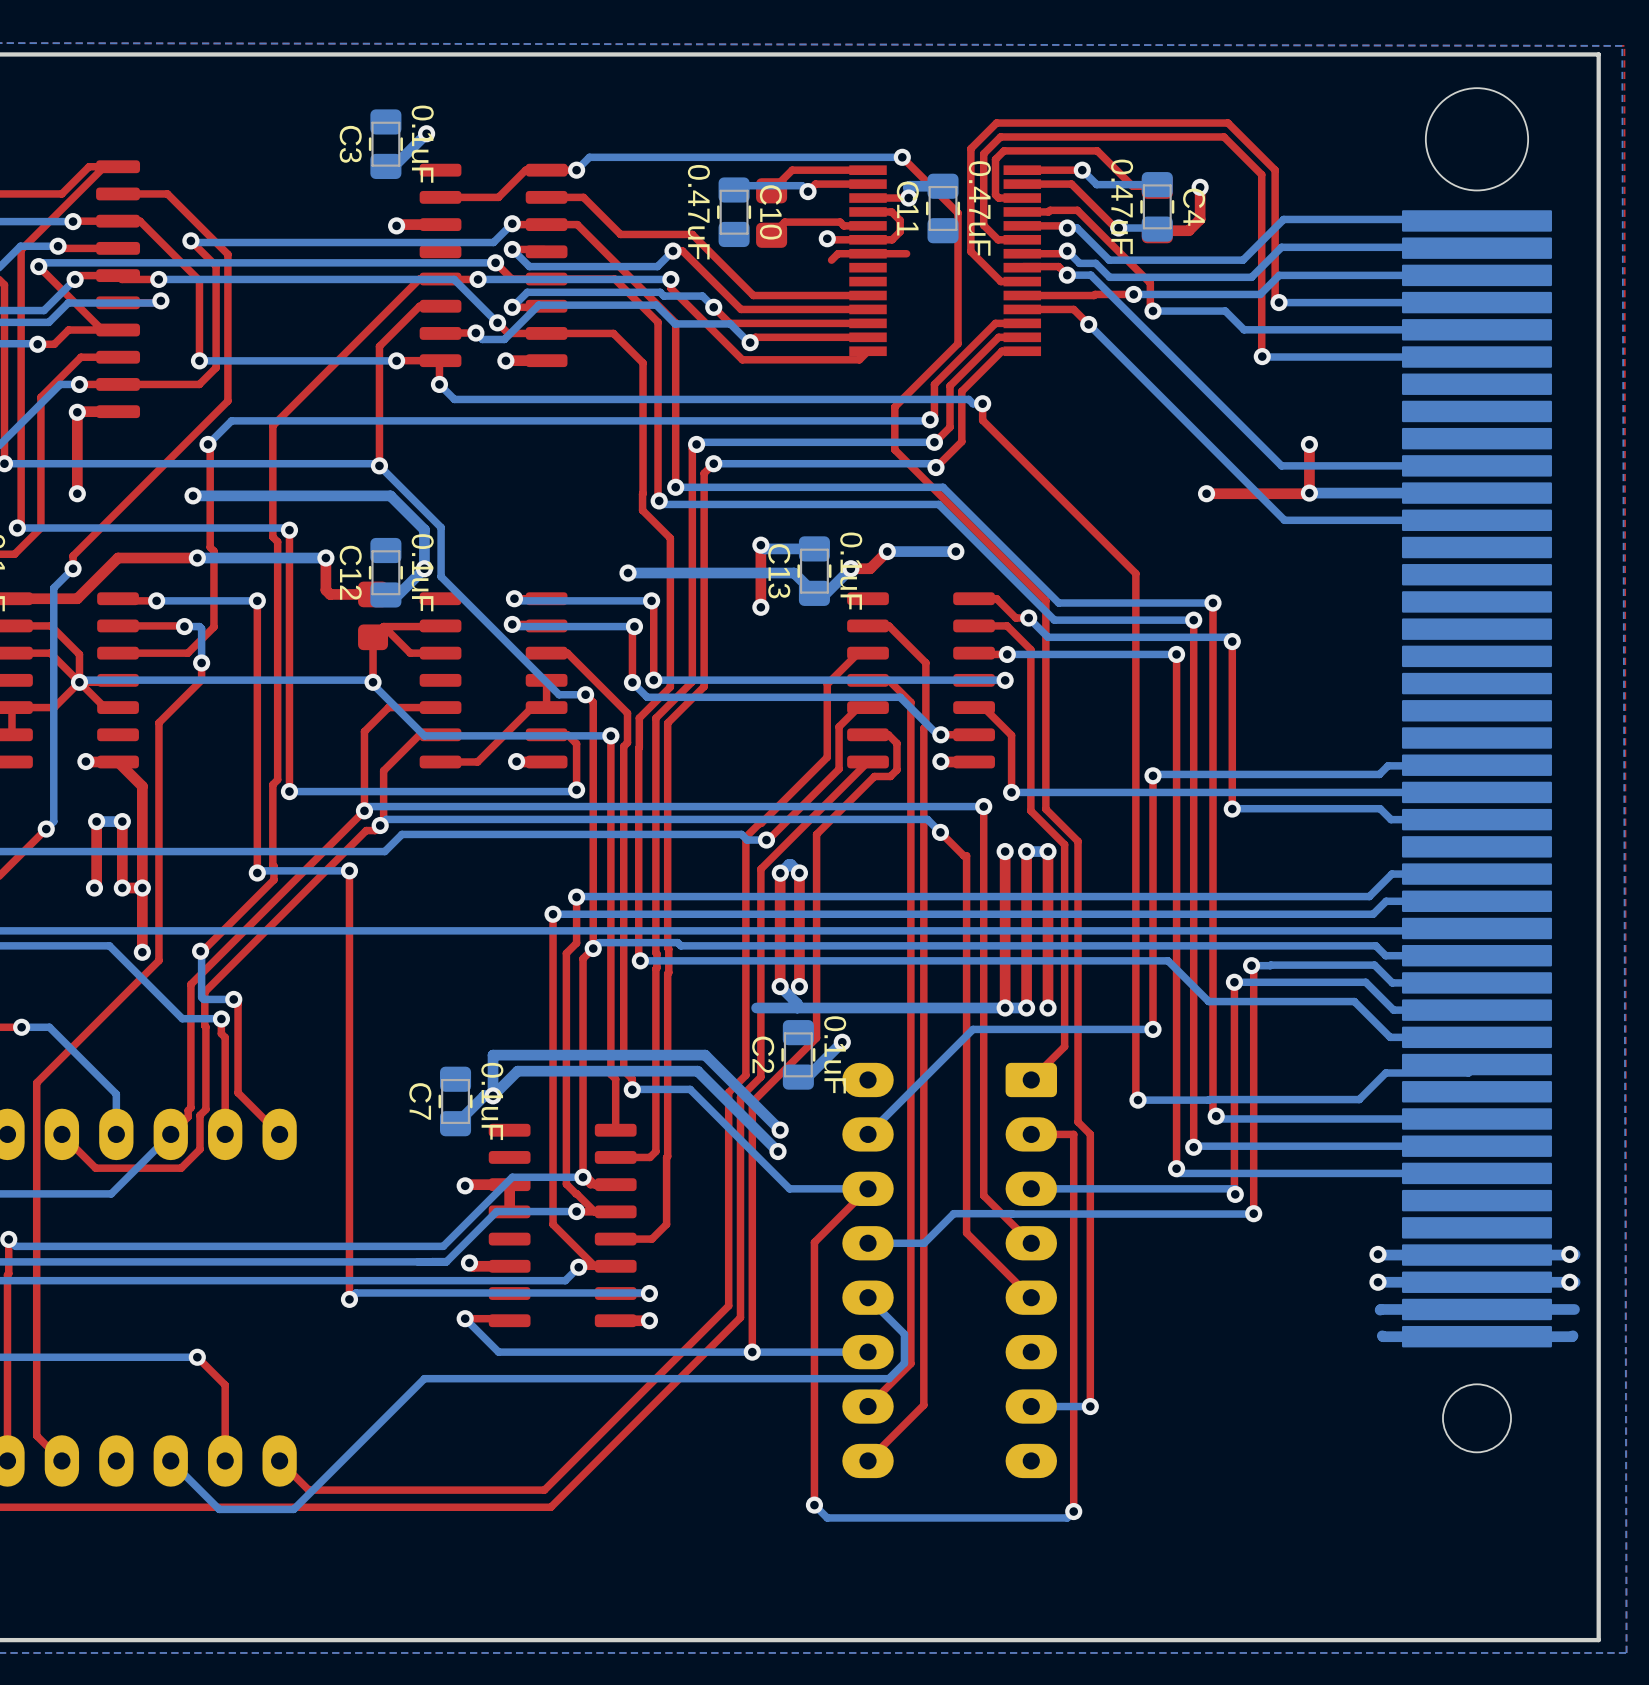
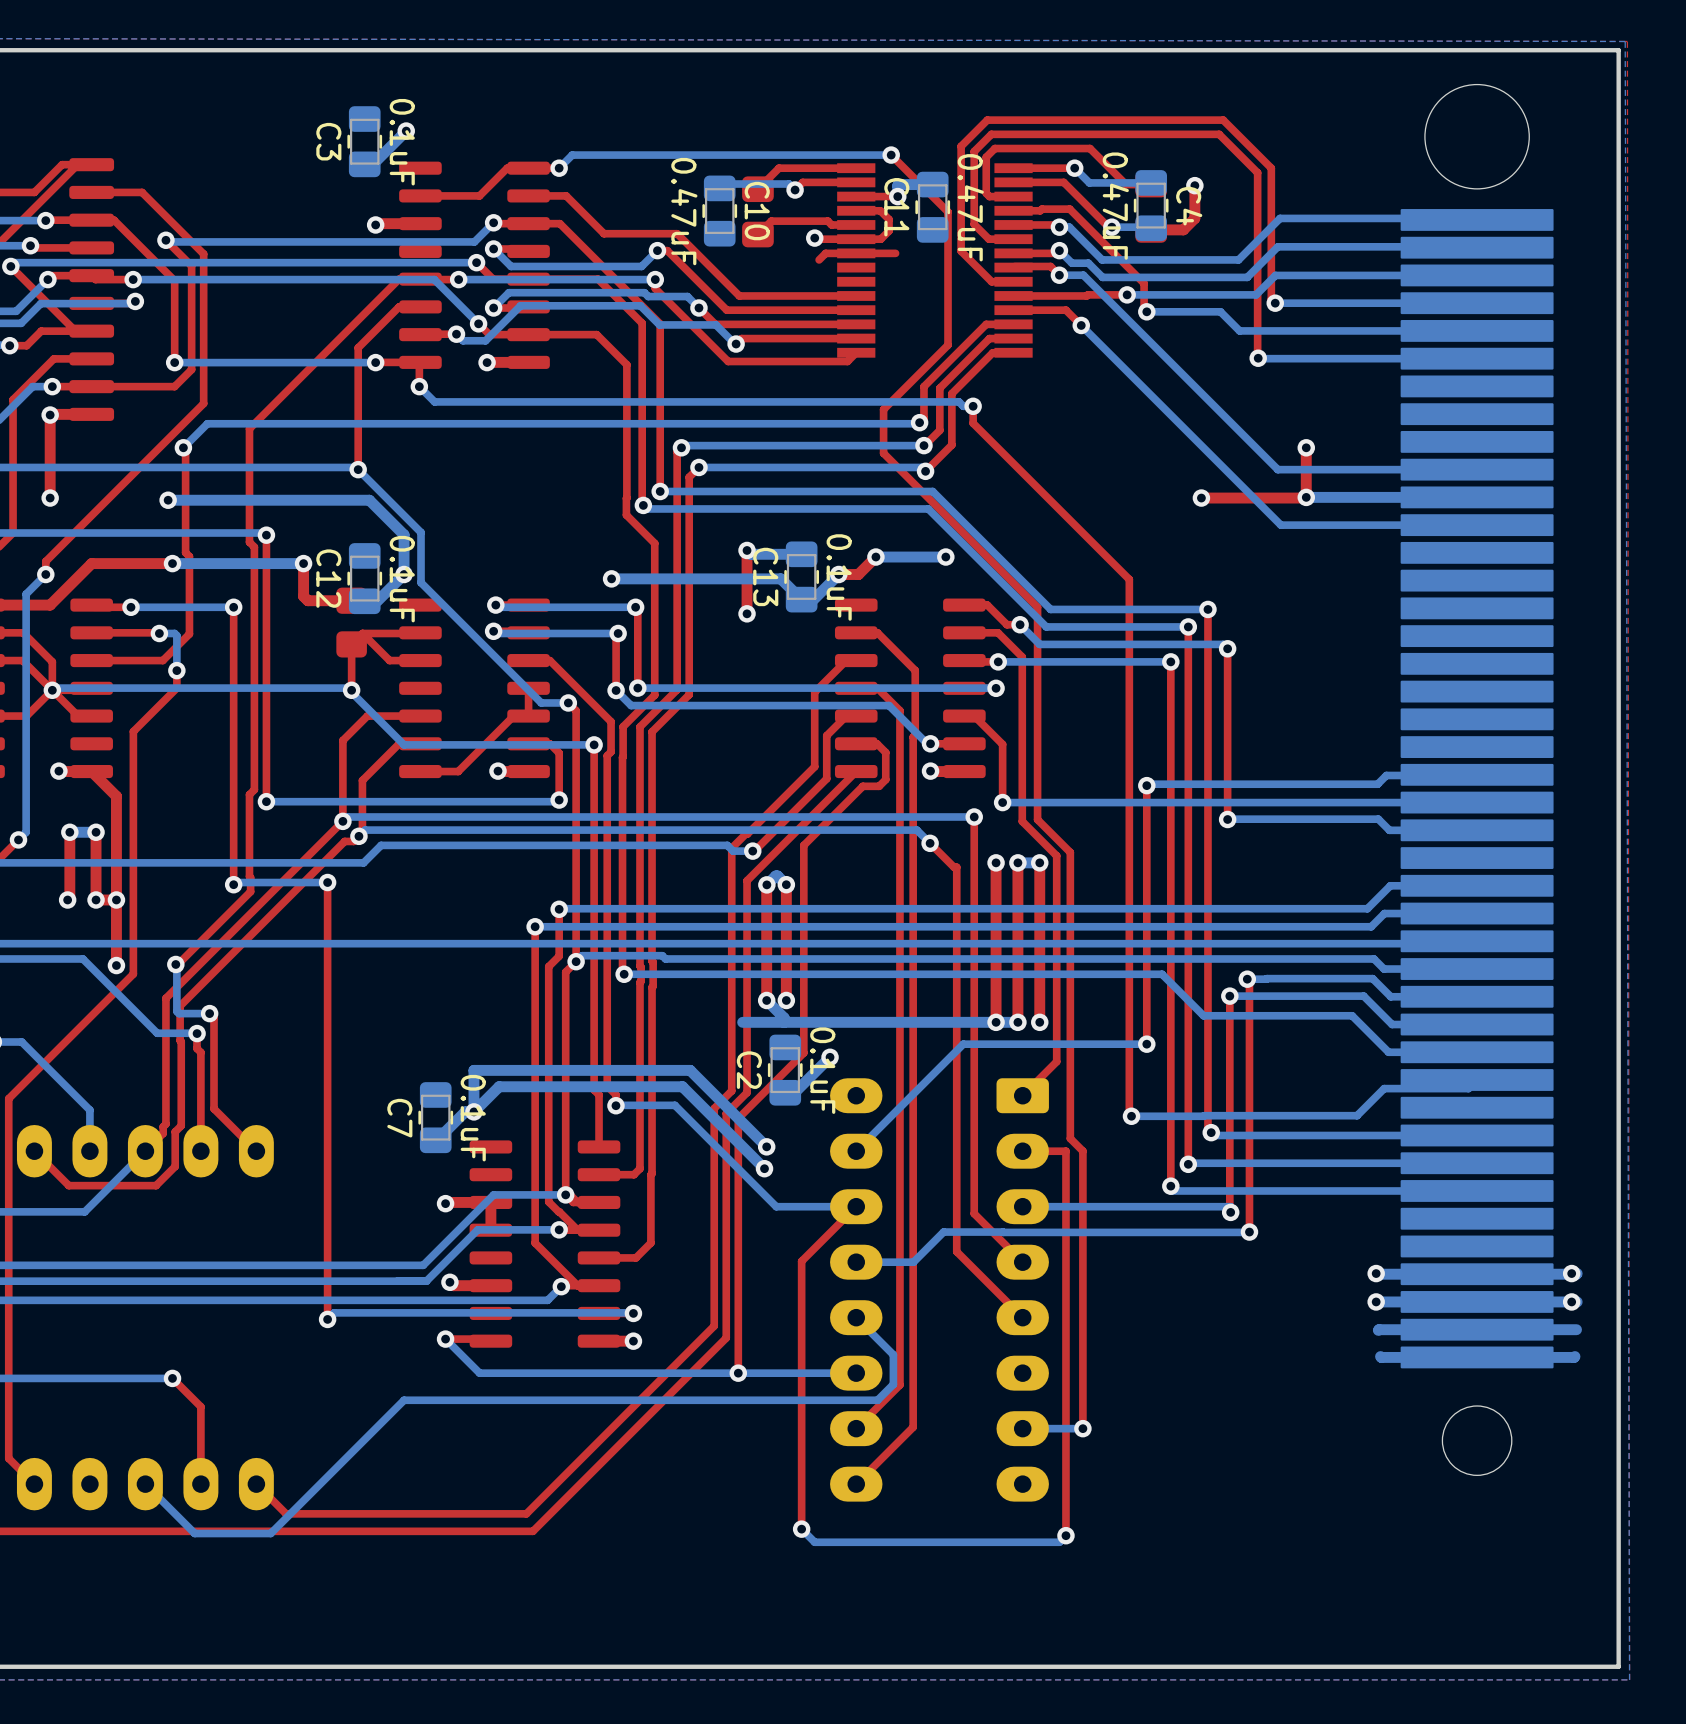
board edge: (1598, 54) (1598, 1640) -> (1601, 50) (1618, 50) (1618, 1666) (1601, 1666)

